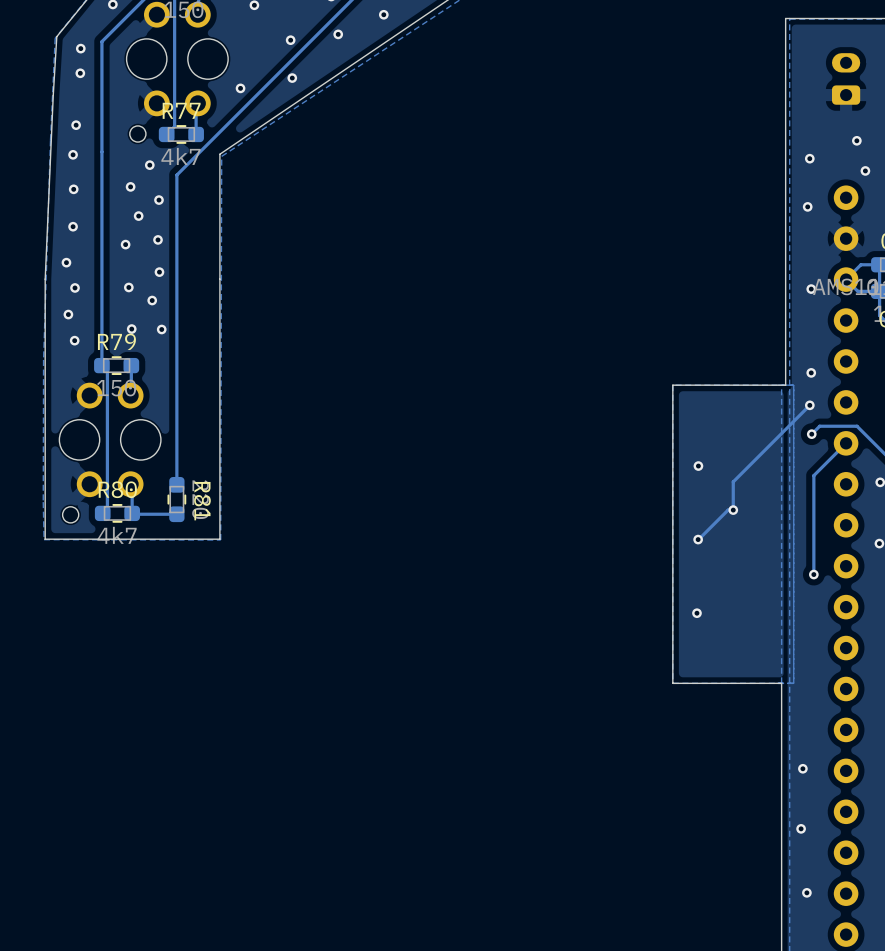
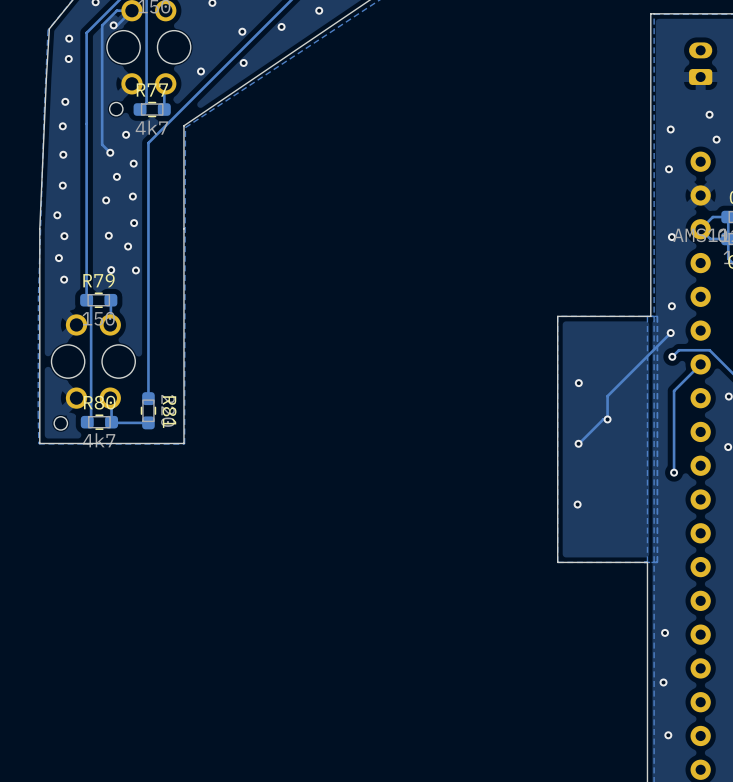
track: none -> (113, 25) (117, 25) (131, 10) (116, 10) (102, 25) (102, 144) (110, 152)
via: none -> (113, 25)

